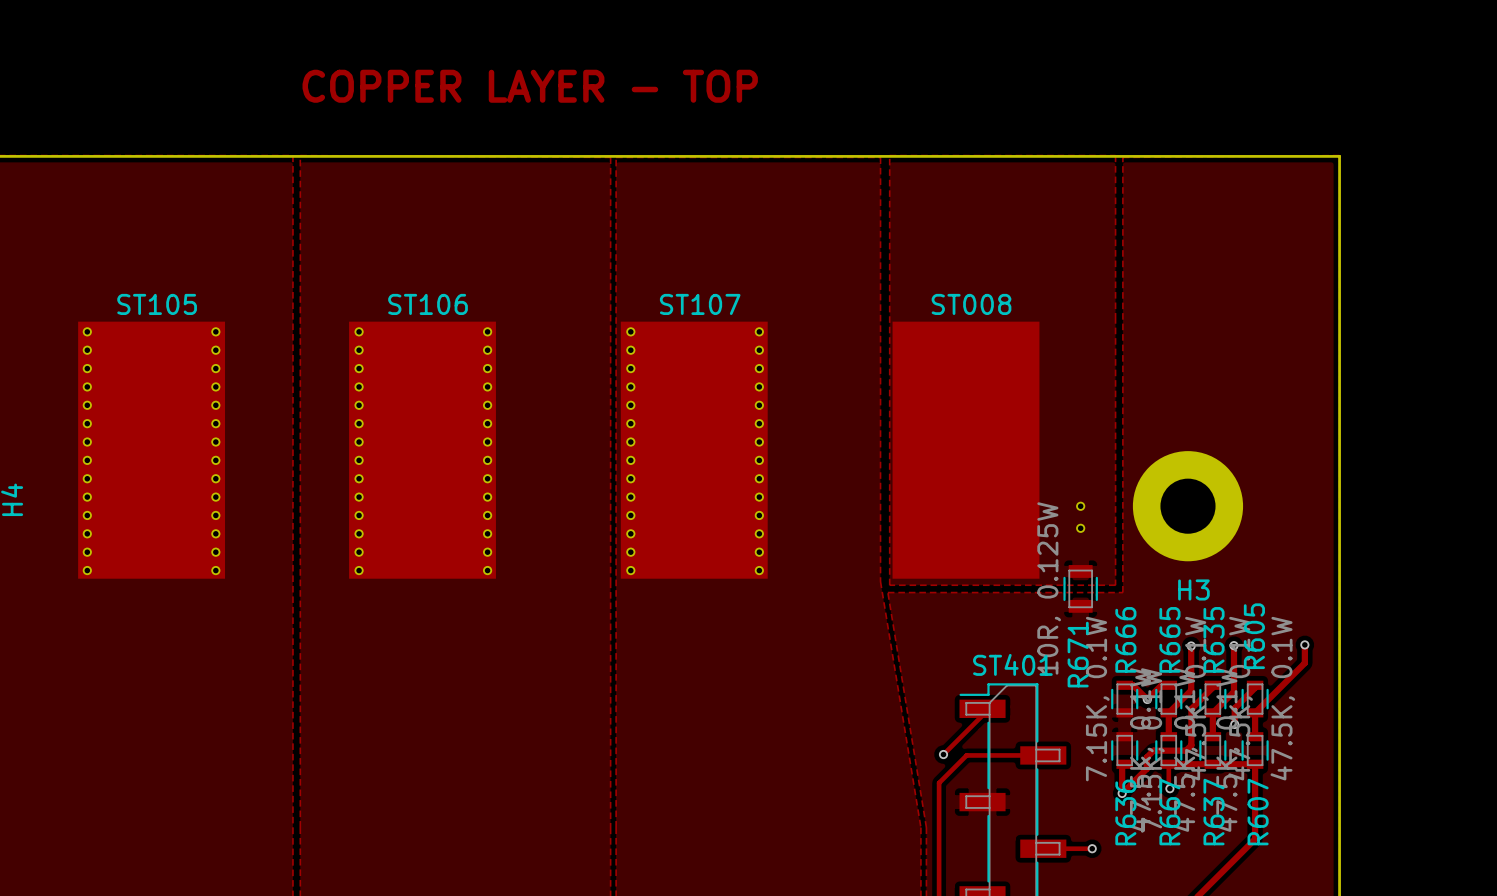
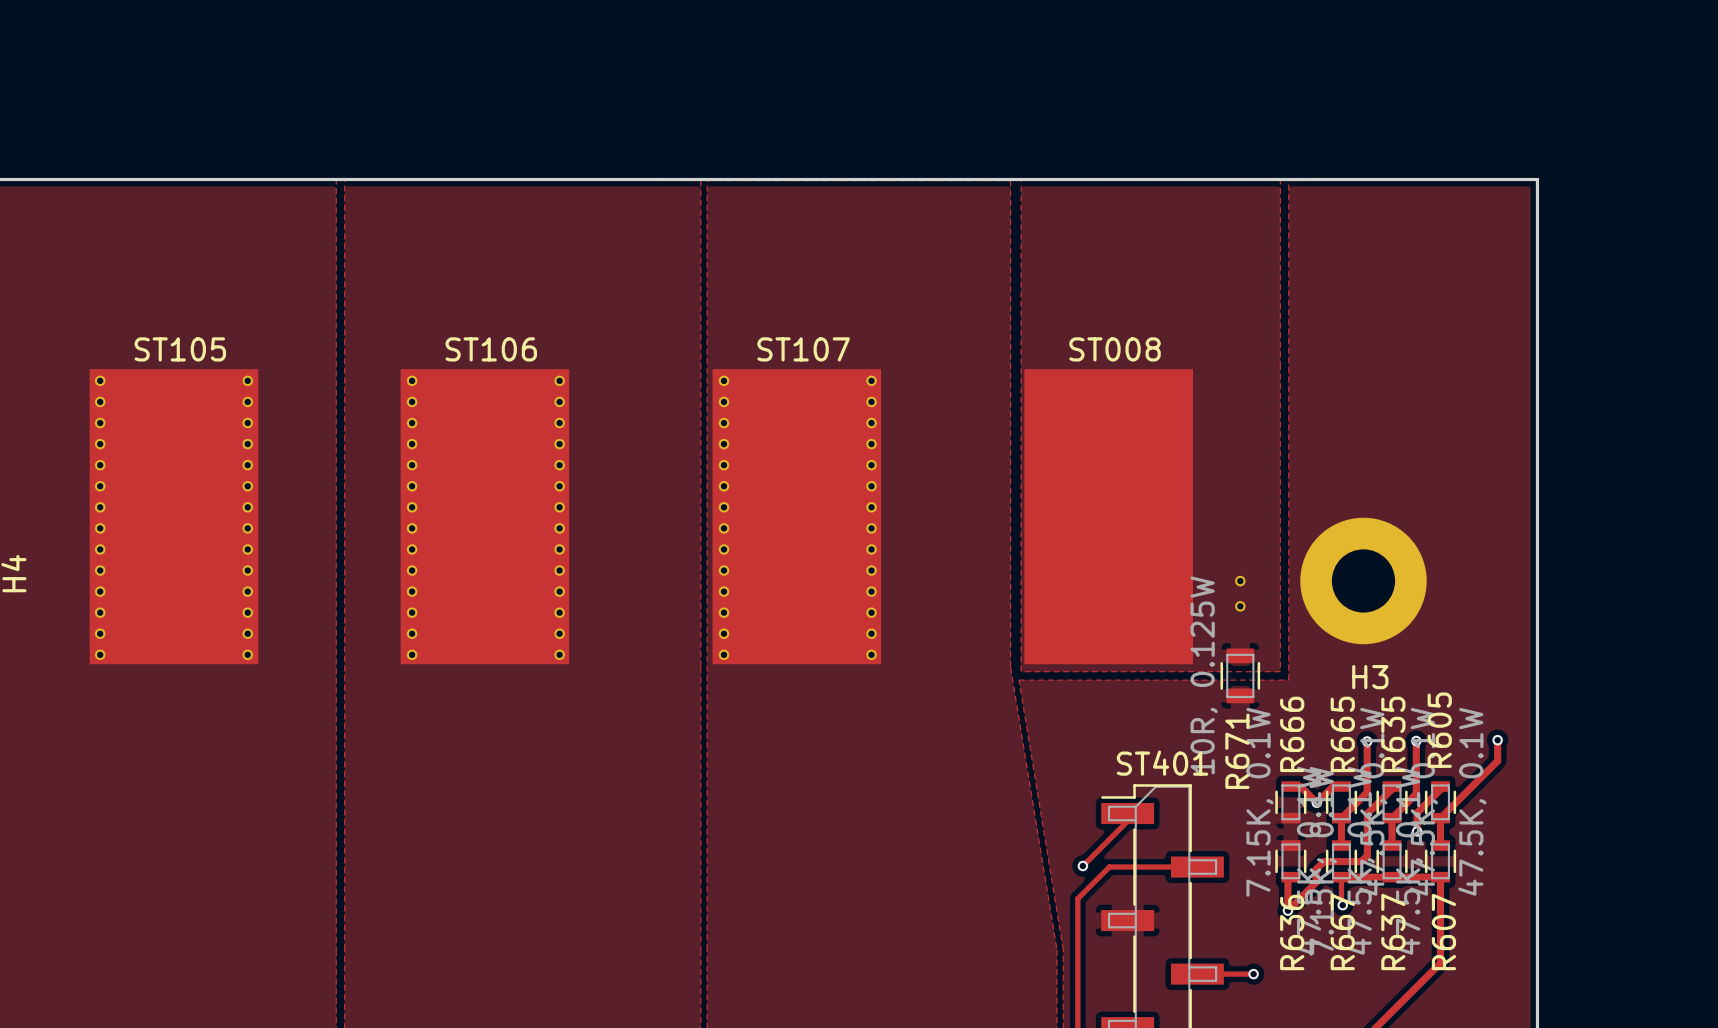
text: COPPER LAYER - TOP (530, 86) -> none

